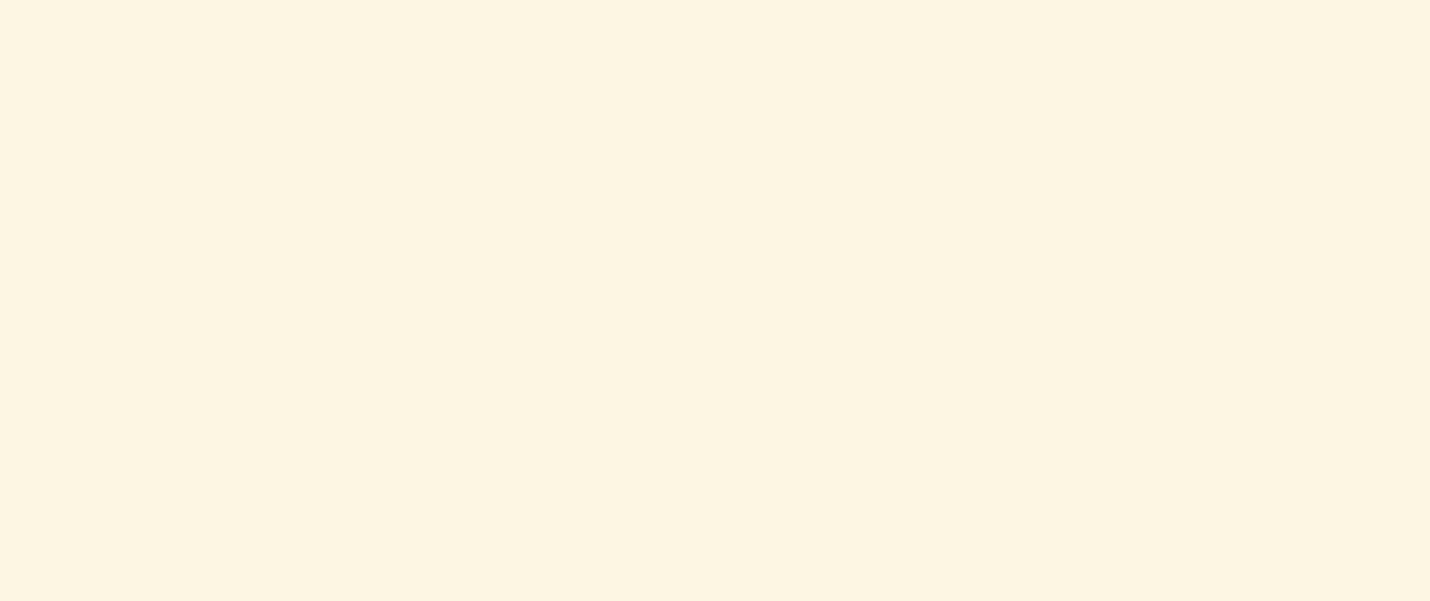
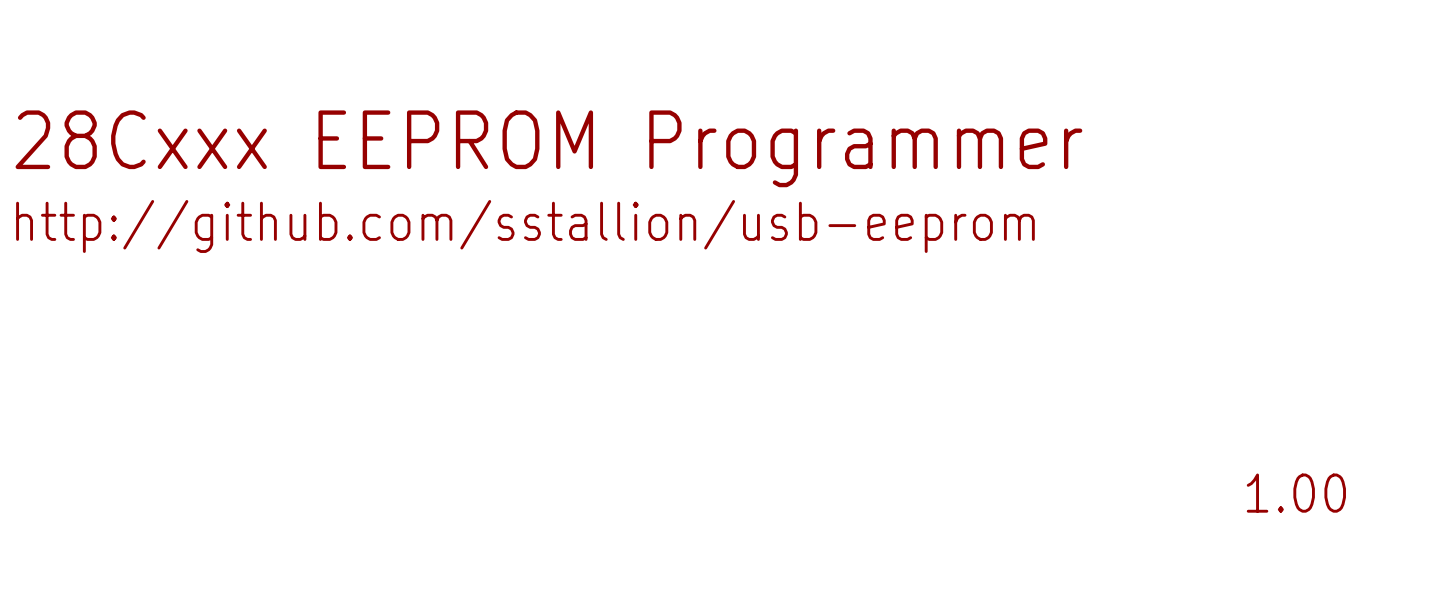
text: none -> 28Cxxx EEPROM Programmer (548, 148)
text: none -> http://github.com/sstallion/usb-eeprom (525, 226)
text: none -> 1.00 (1296, 493)

